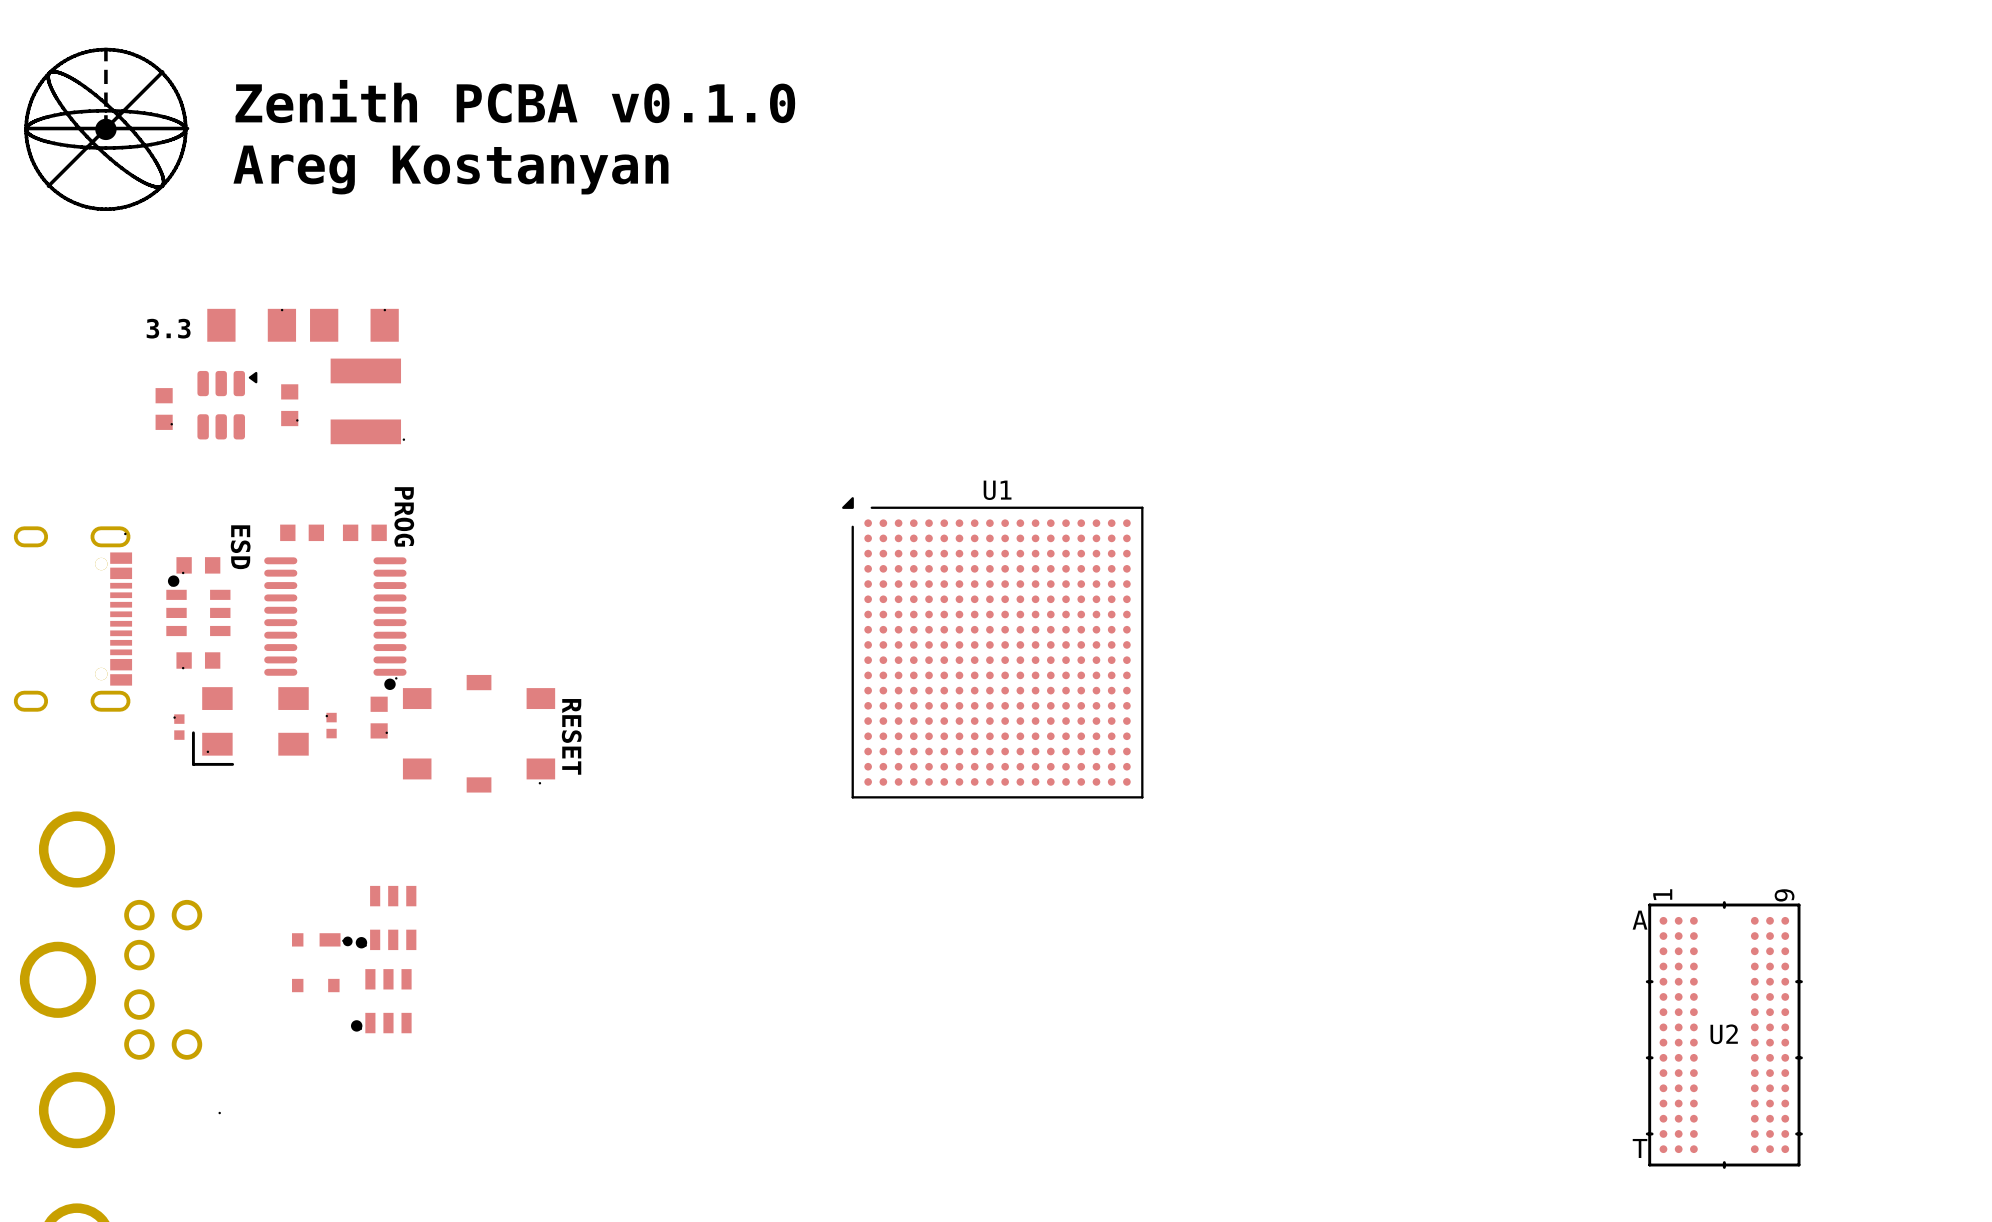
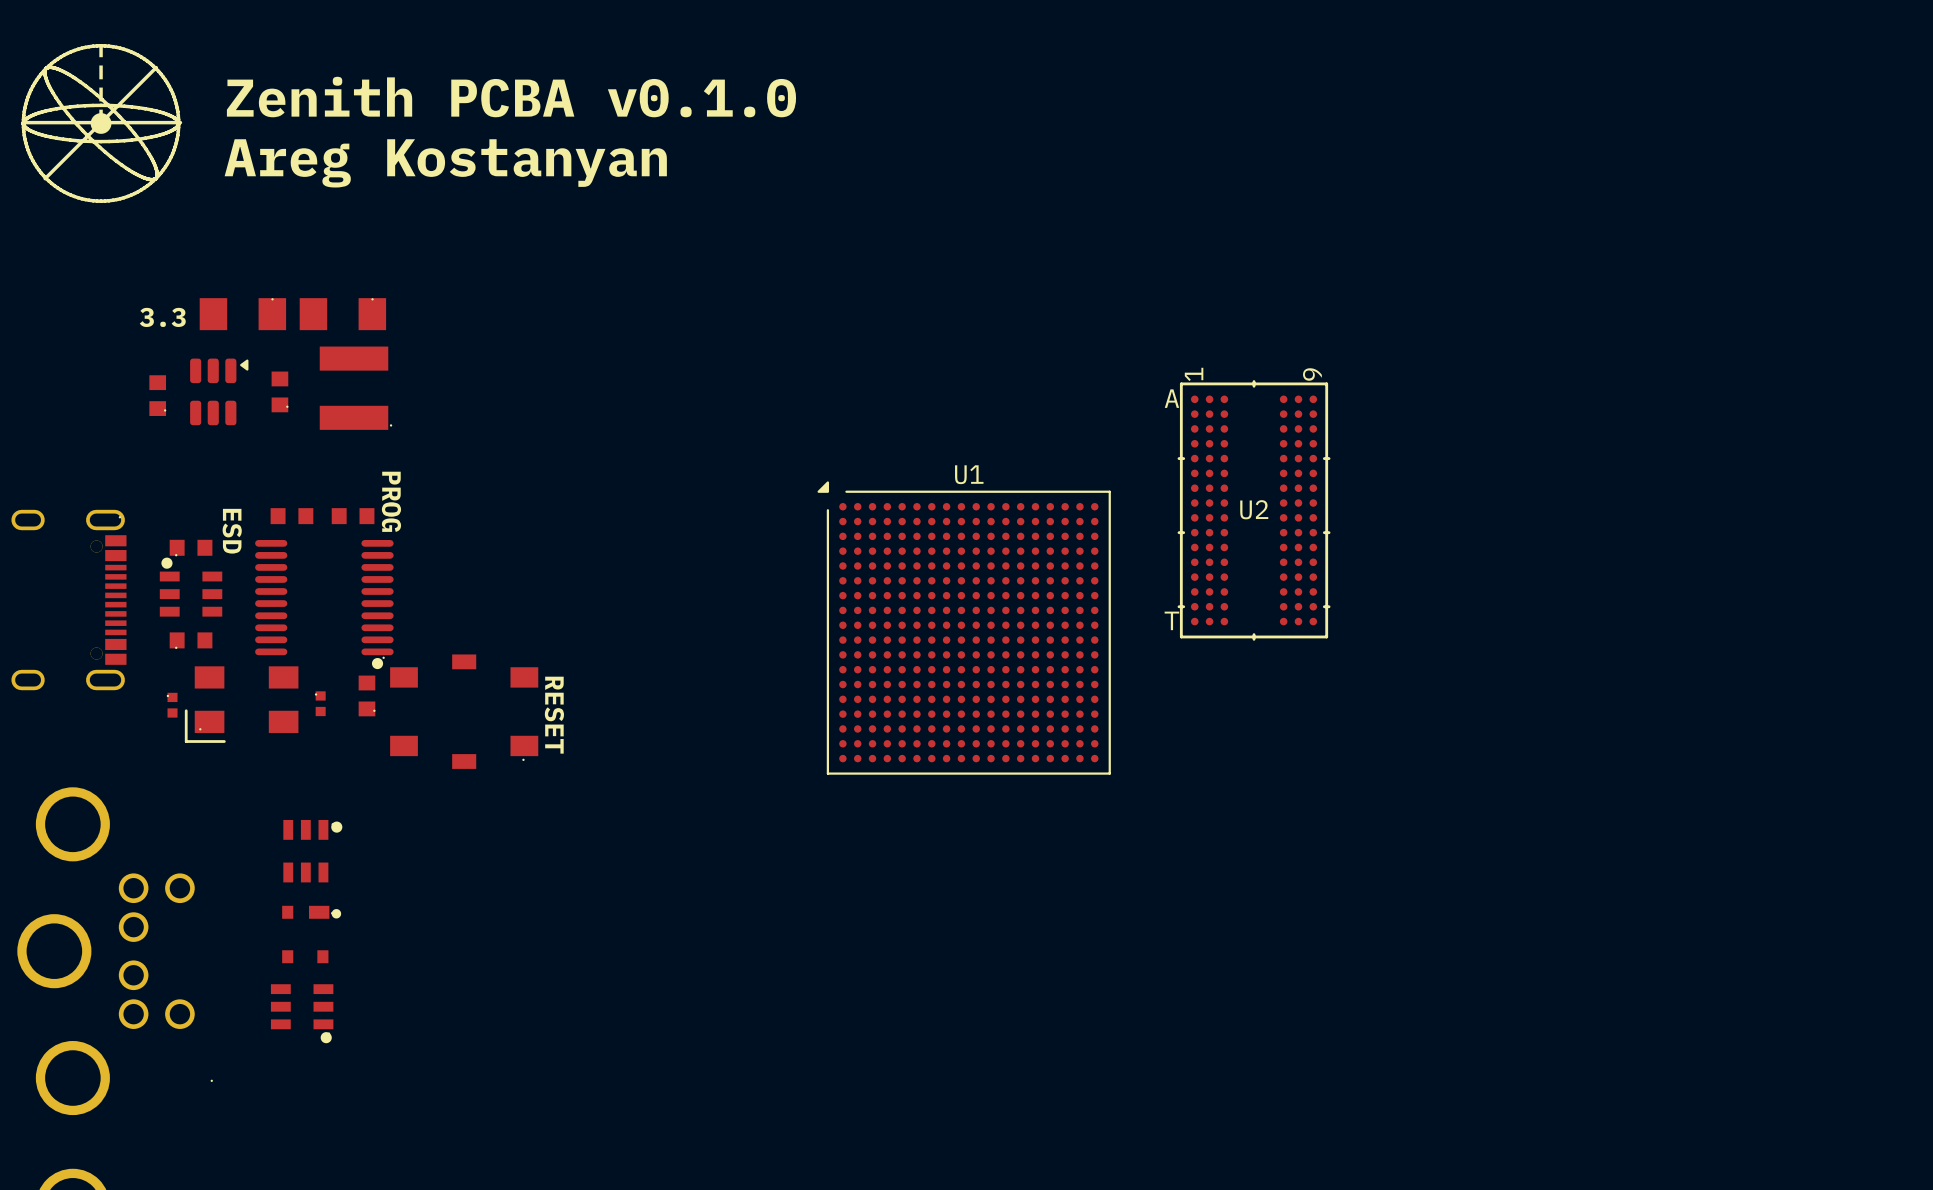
part: none -> (312, 851)
part: (386, 917) -> none
part: (381, 1001) -> none
U2 position: (1724, 1035) -> (1254, 510)
part: none -> (302, 1013)

